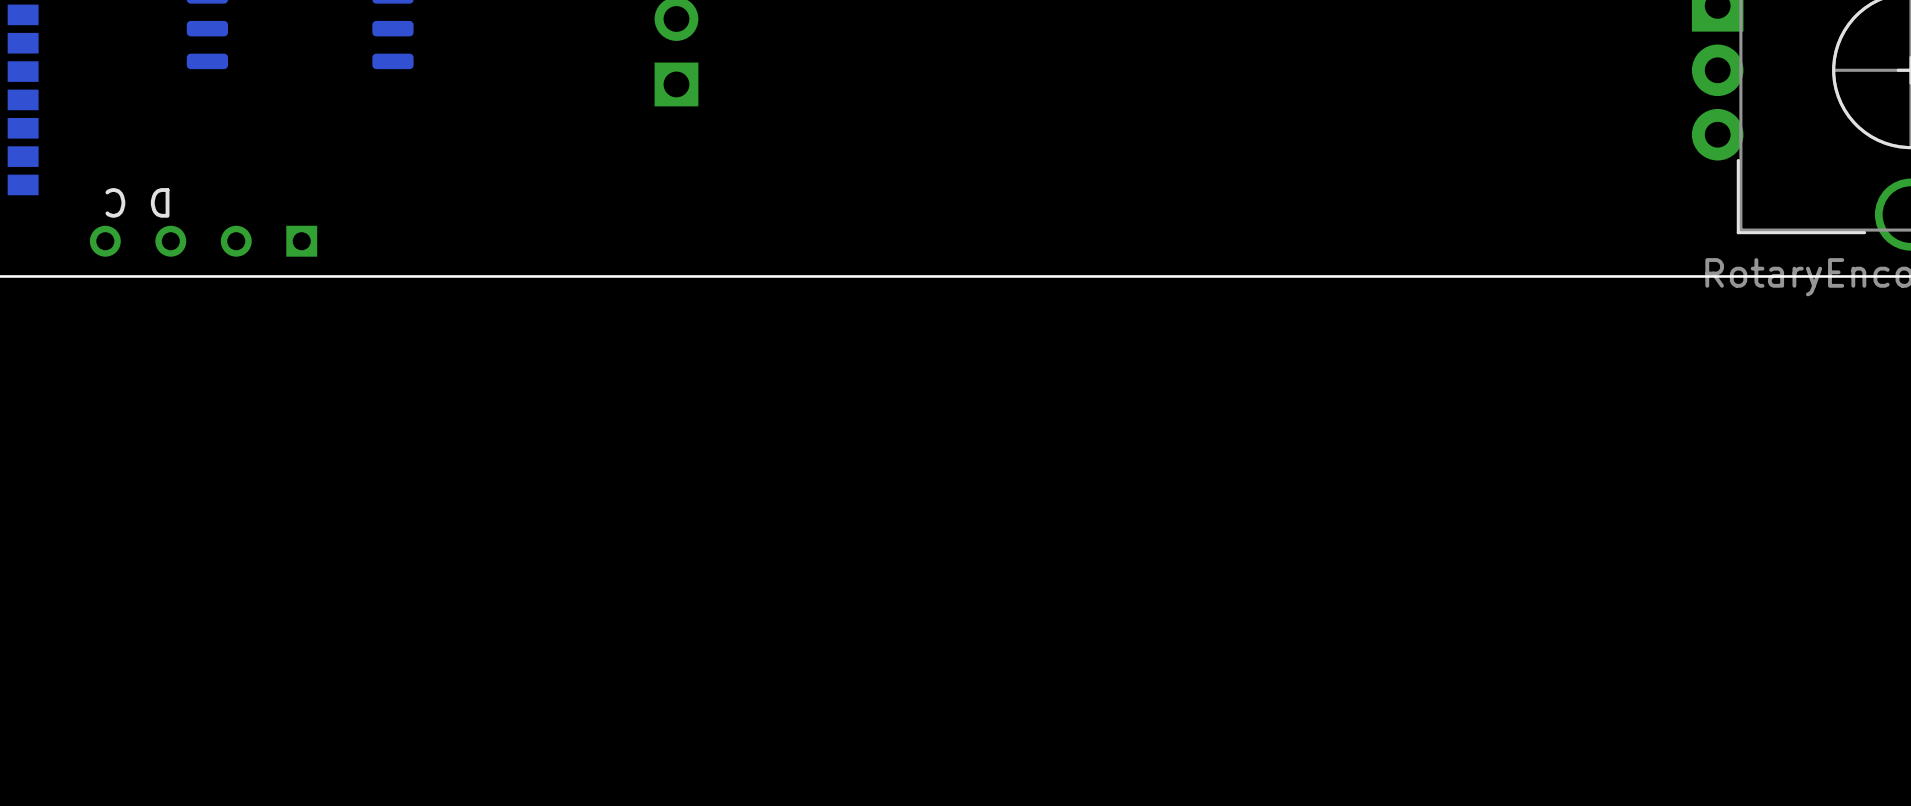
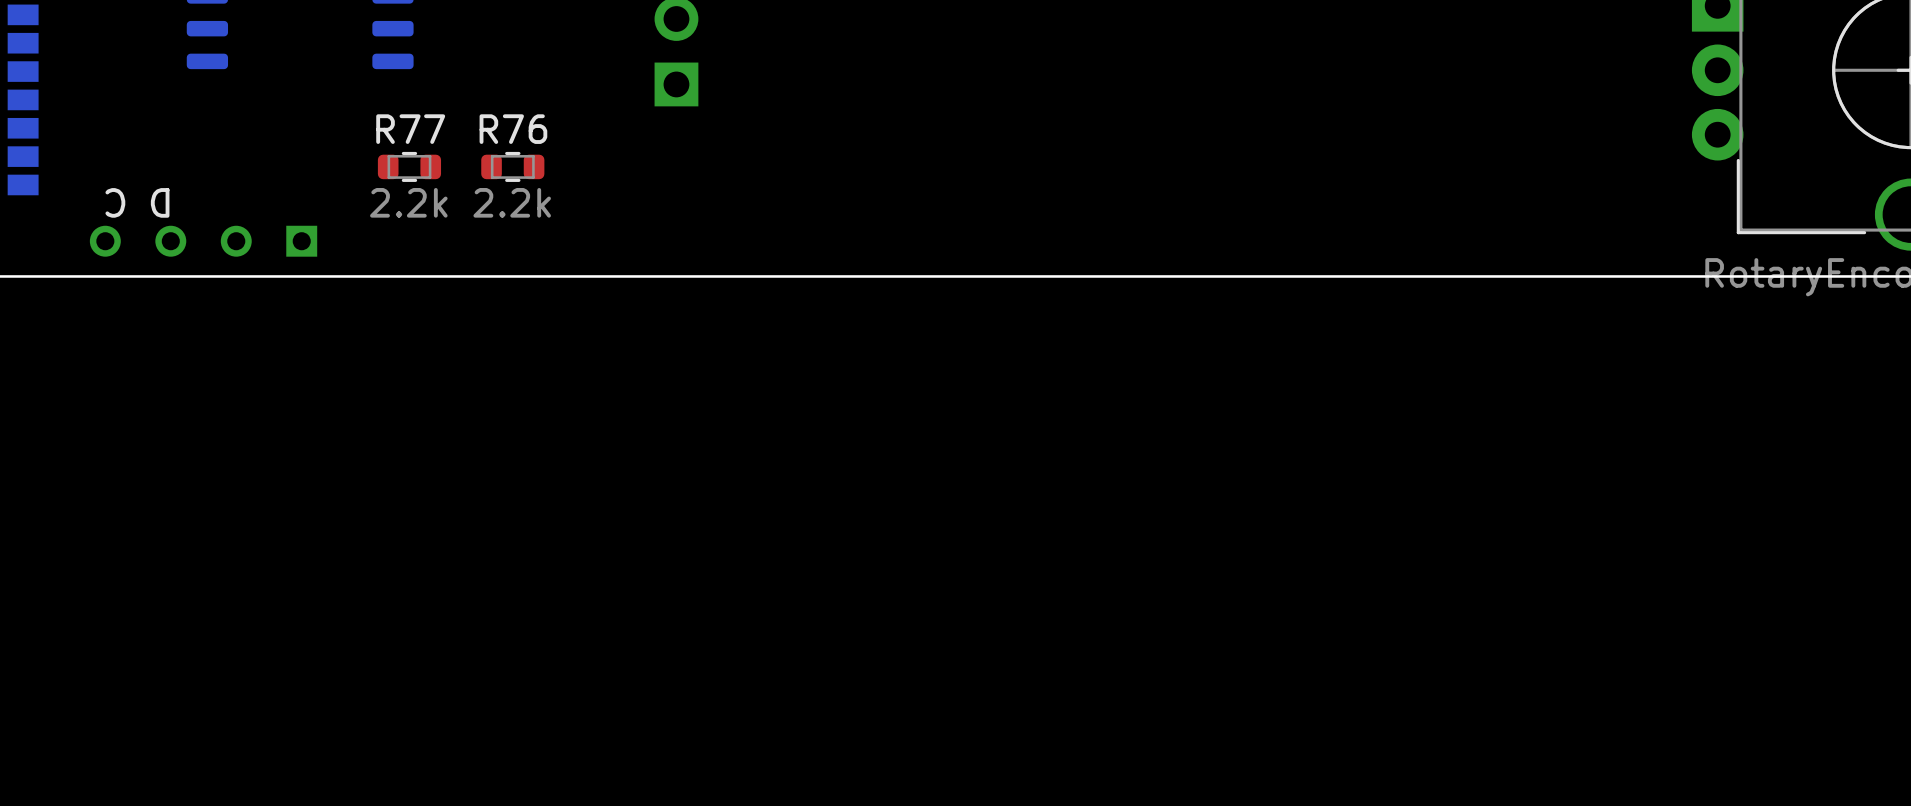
R77: none -> 2.2k (409, 166)
R76: none -> 2.2k (512, 166)

